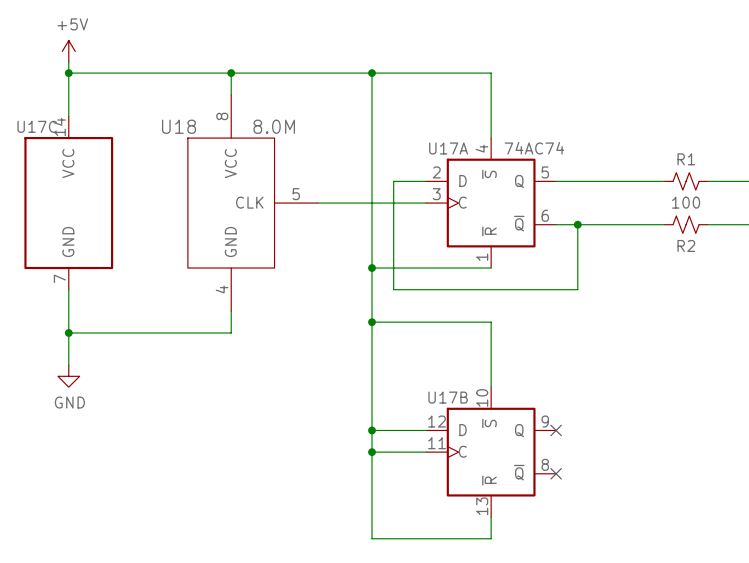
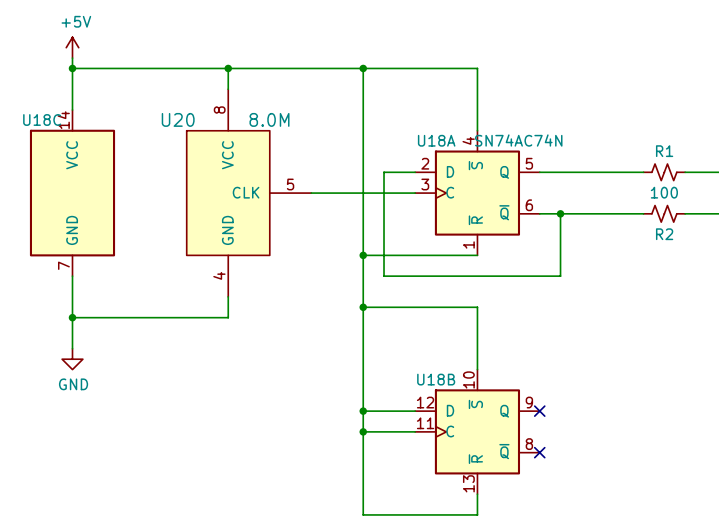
U17C name: U17C (37, 126) -> U18C (42, 119)
U18 name: U18 (179, 126) -> U20 (178, 119)
U17A name: U17A (448, 148) -> U18A (436, 140)
U17A value: 74AC74 (534, 148) -> SN74AC74N (518, 140)
U17B name: U17B (448, 397) -> U18B (436, 379)

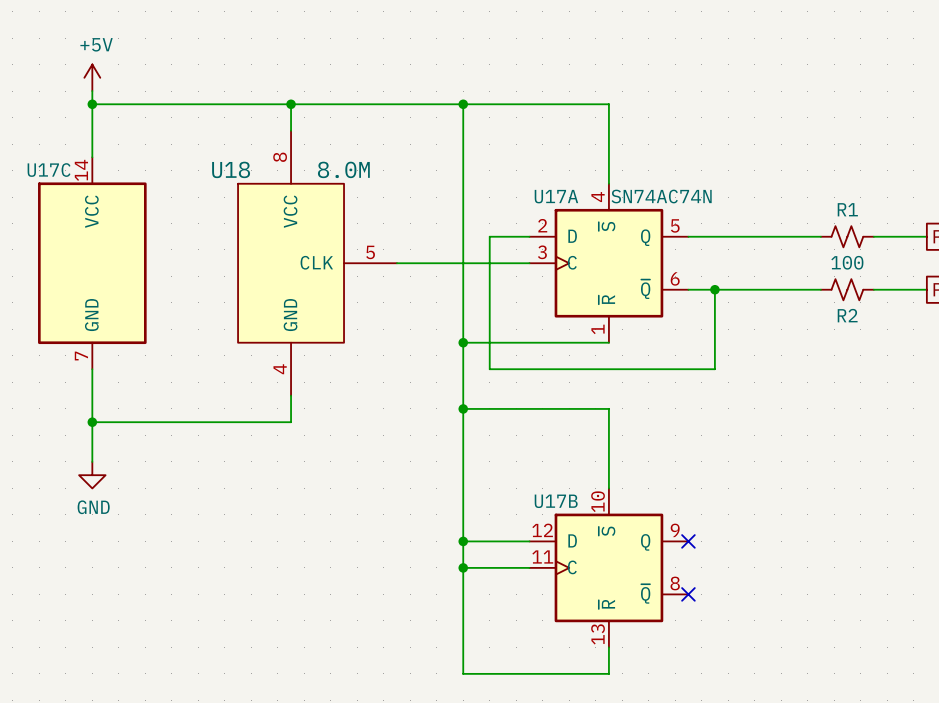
U18C name: U18C (42, 119) -> U17C (49, 170)
U20 name: U20 (178, 119) -> U18 (231, 169)
U18A name: U18A (436, 140) -> U17A (556, 196)
U18B name: U18B (436, 379) -> U17B (556, 501)

